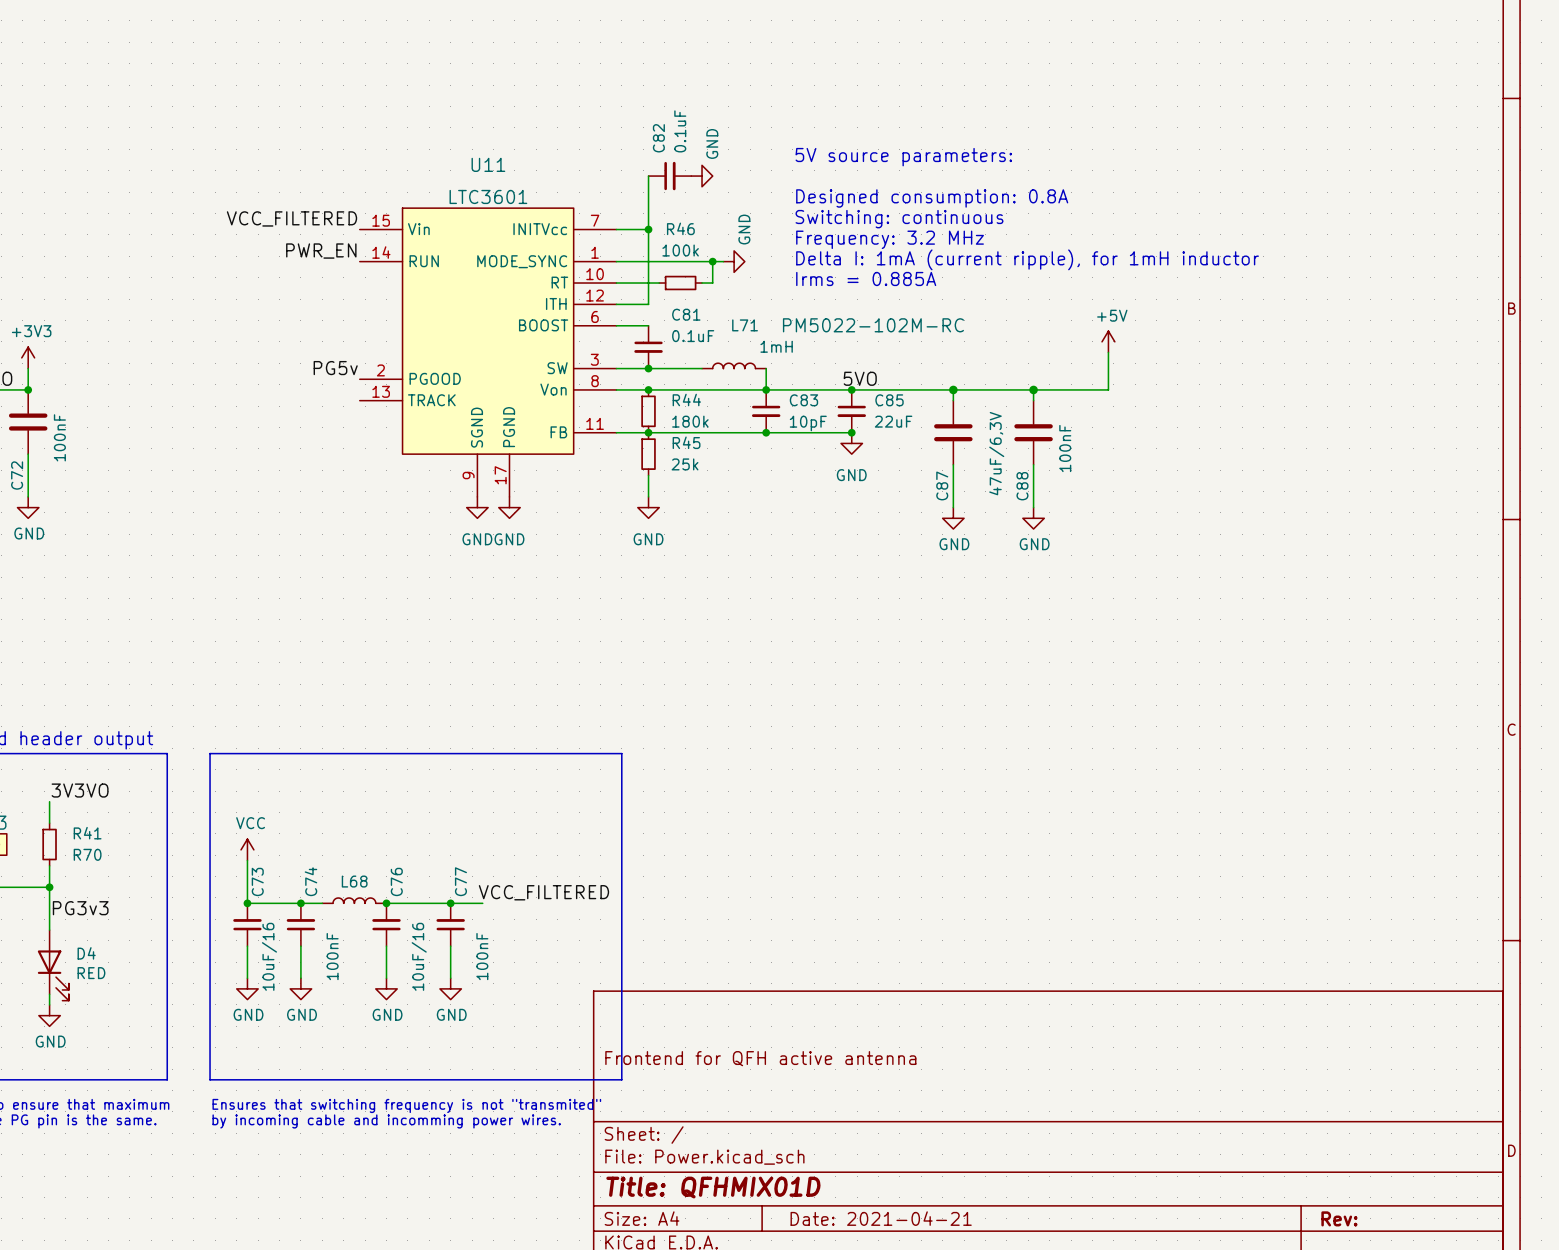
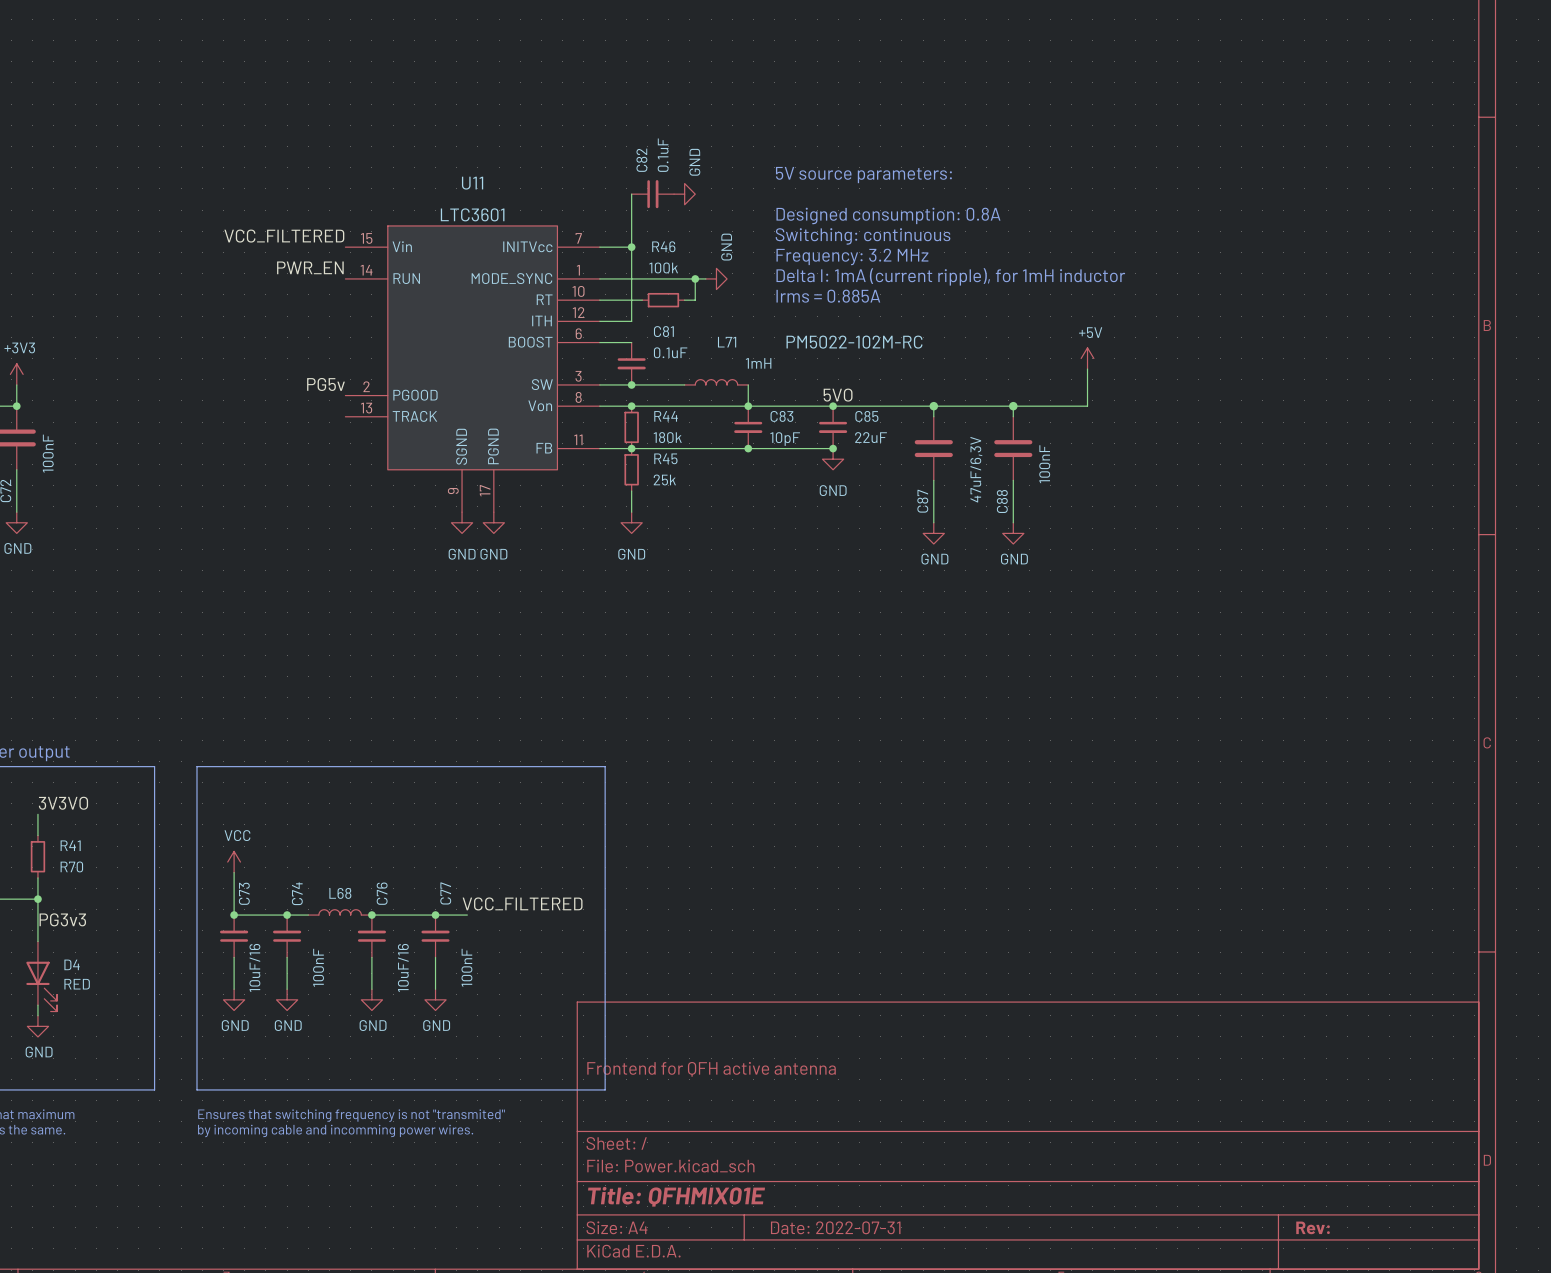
title block: Title: QFHMIX01D (713, 1187) -> Title: QFHMIX01E (676, 1196)
title block: Date: 2021-04-21 (881, 1218) -> Date: 2022-07-31 (835, 1227)

